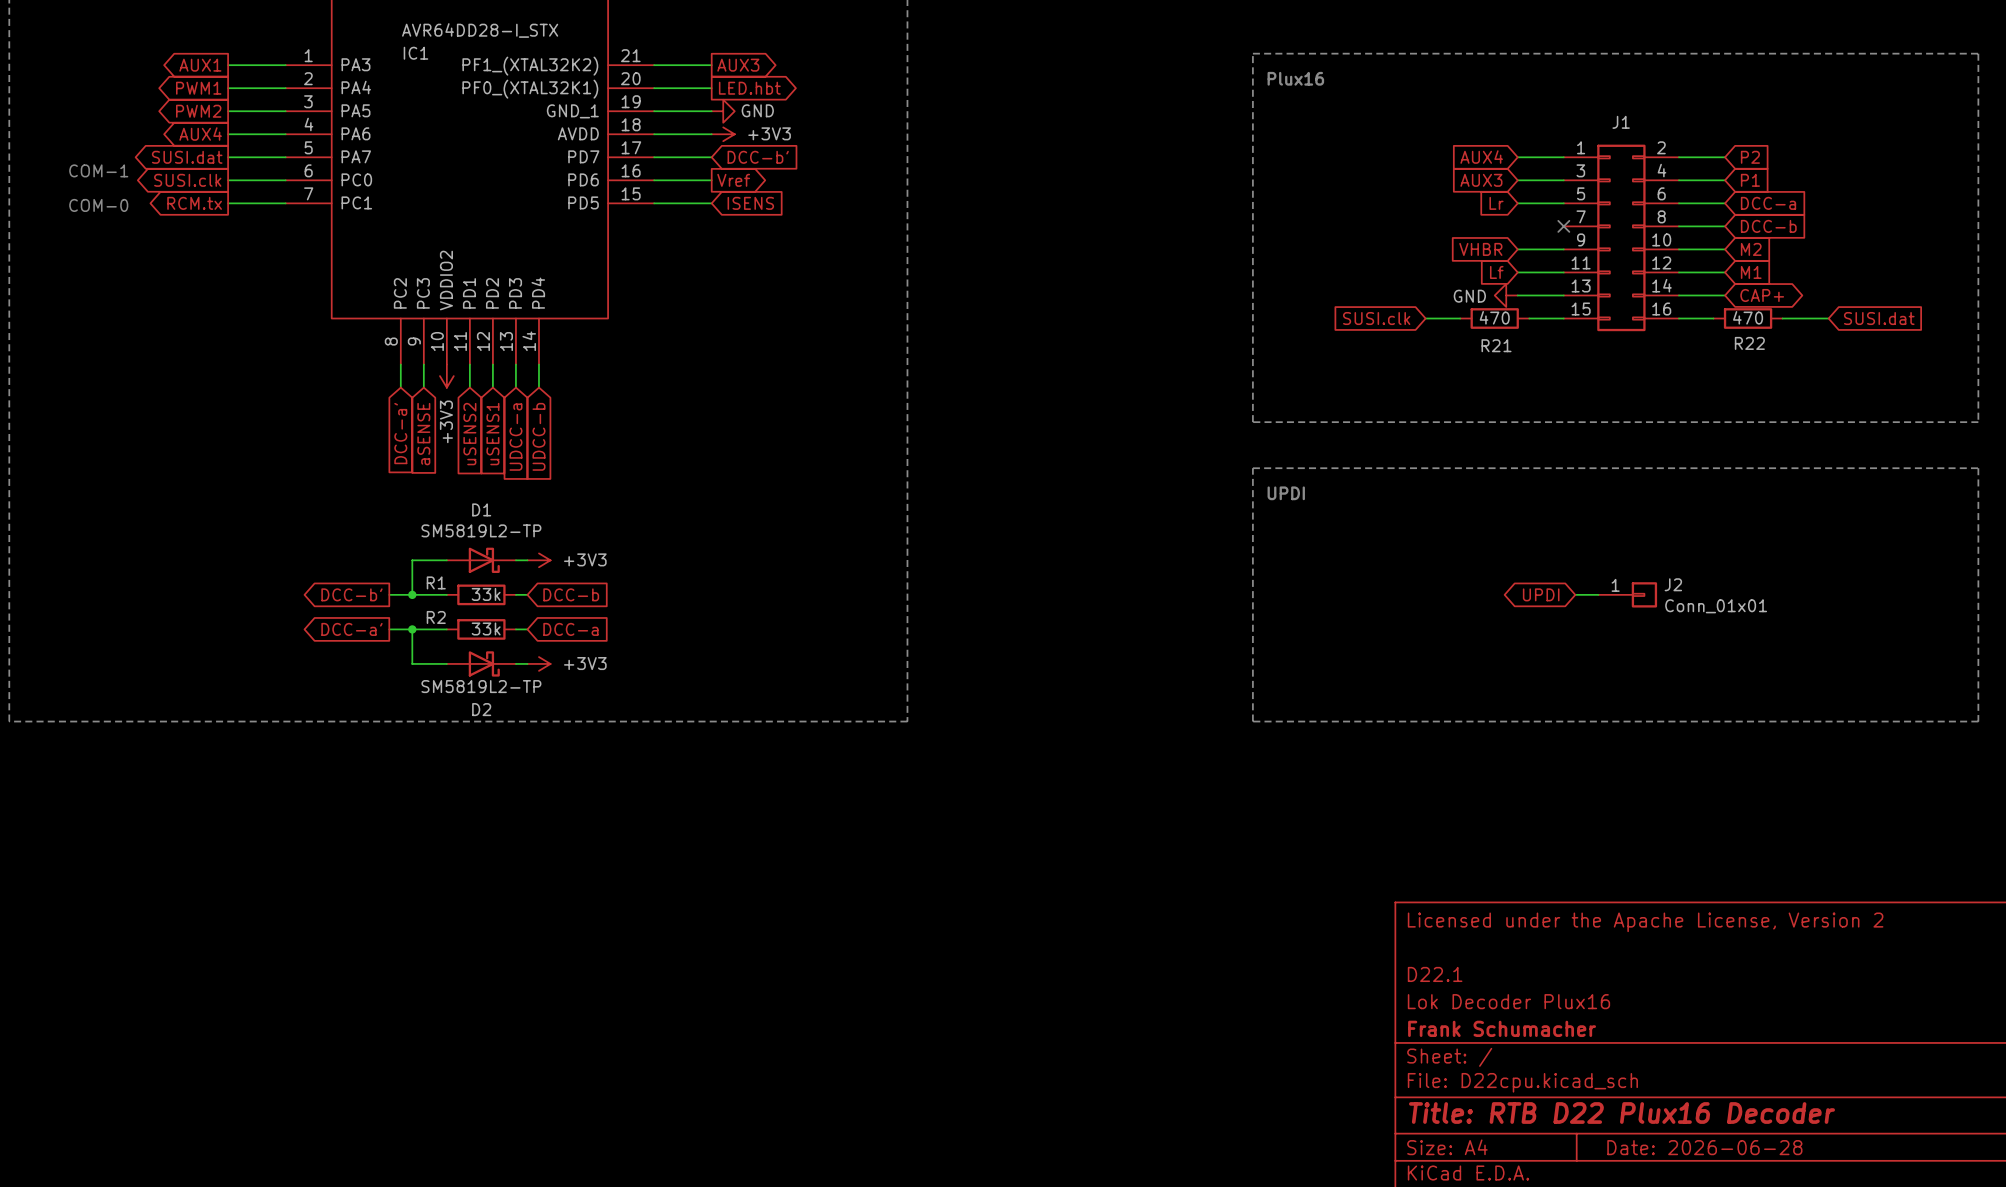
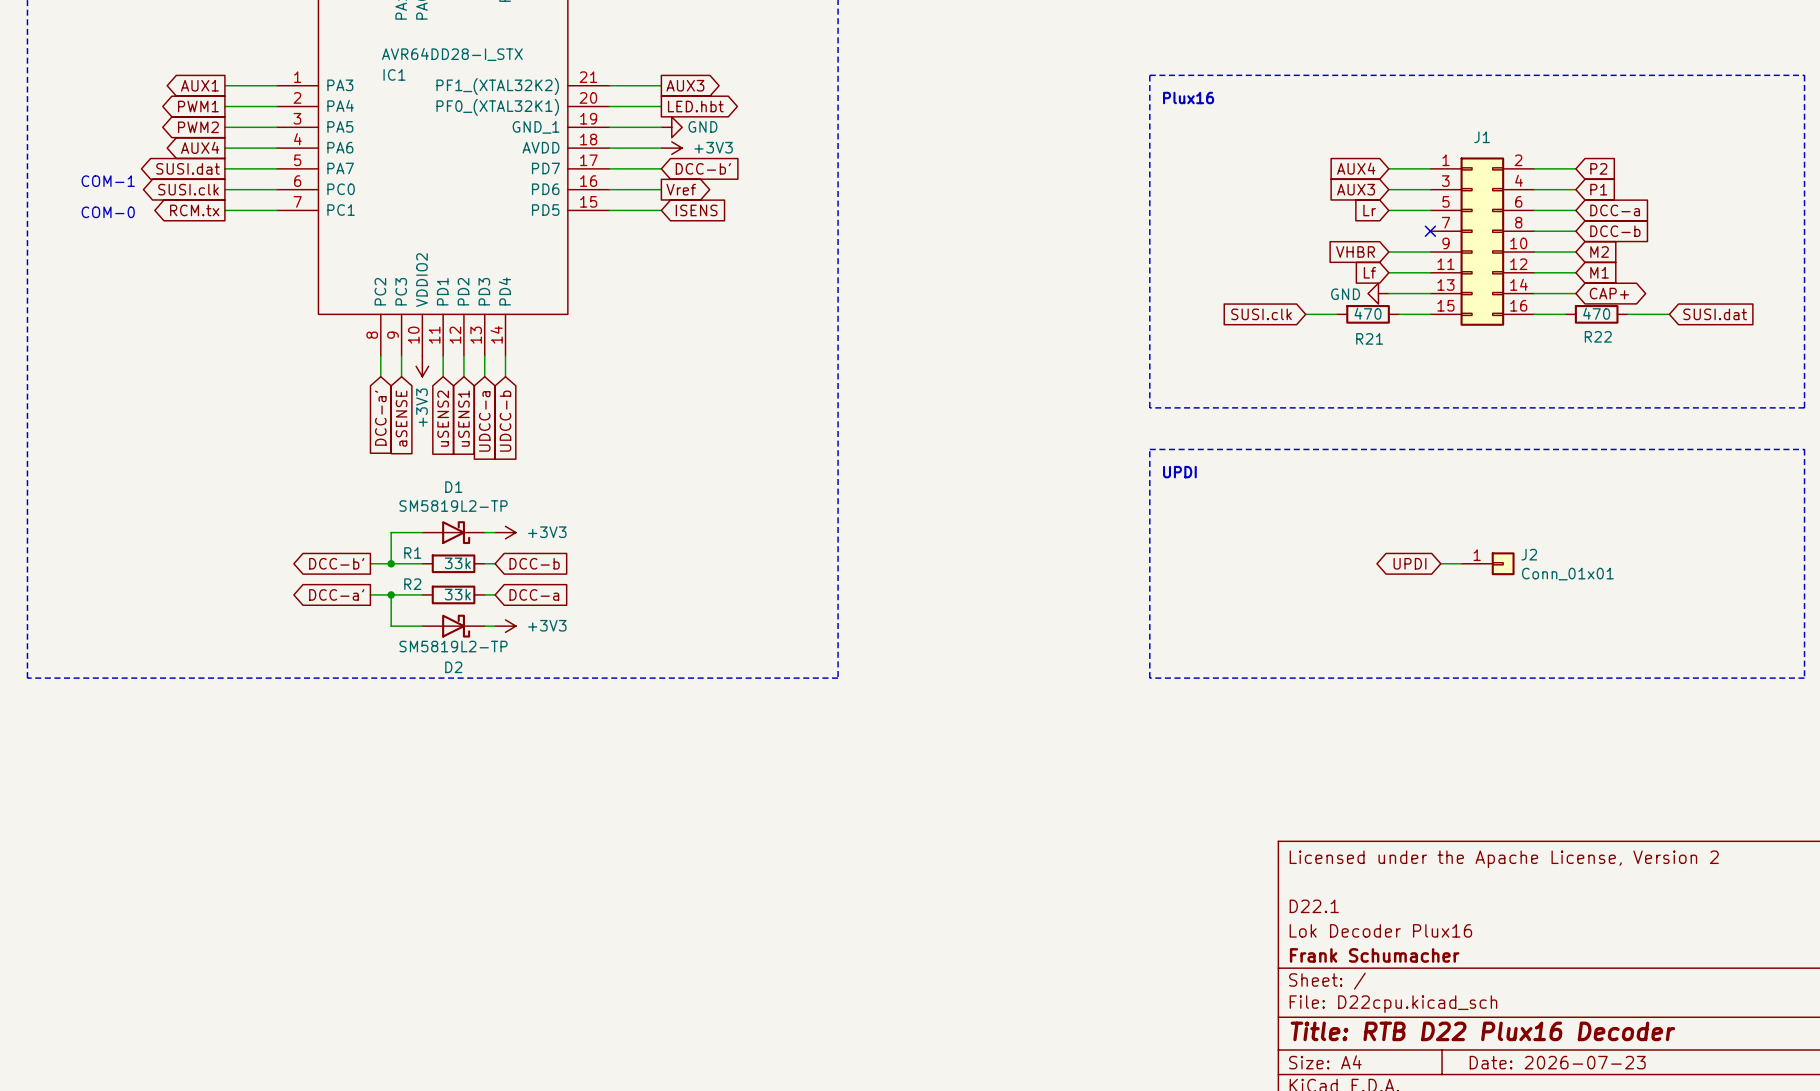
title block: Date: 2026-06-28 (1704, 1147) -> Date: 2026-07-23 (1557, 1062)

